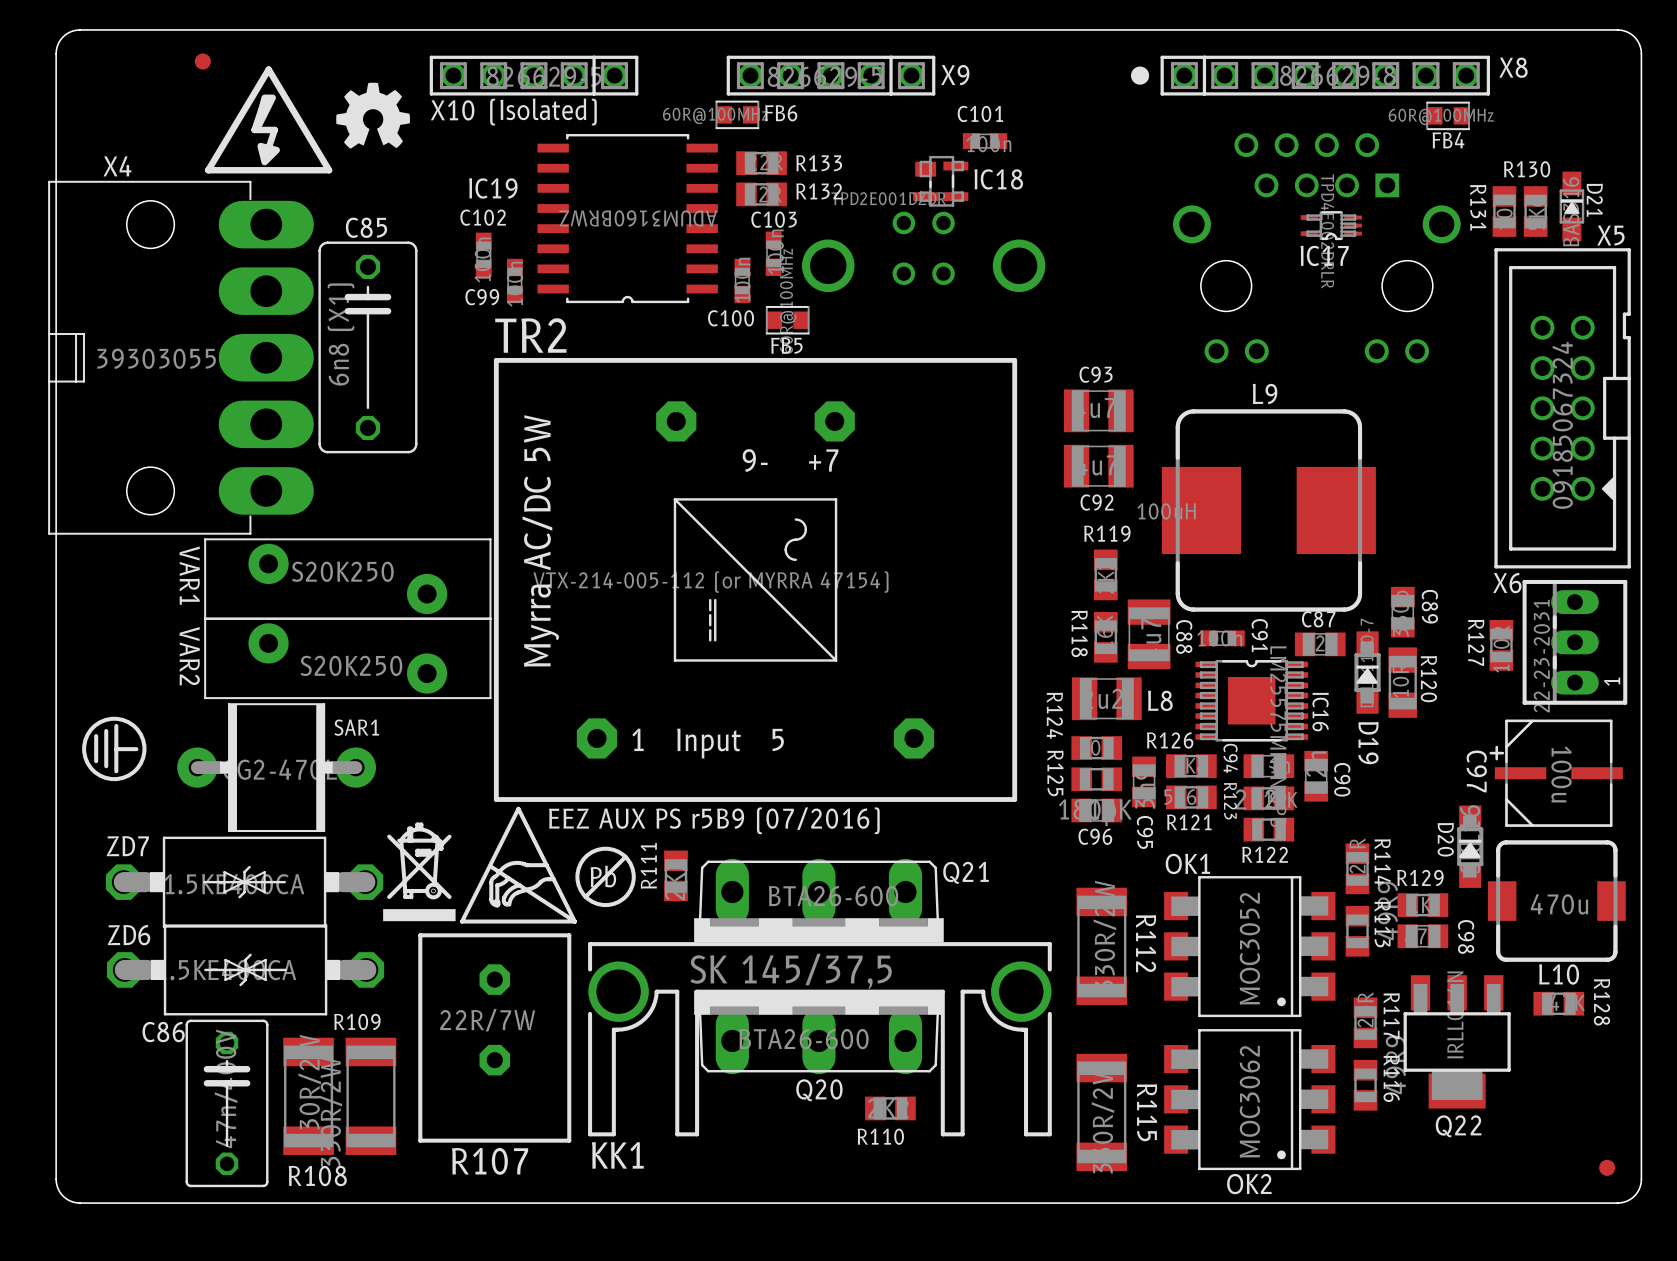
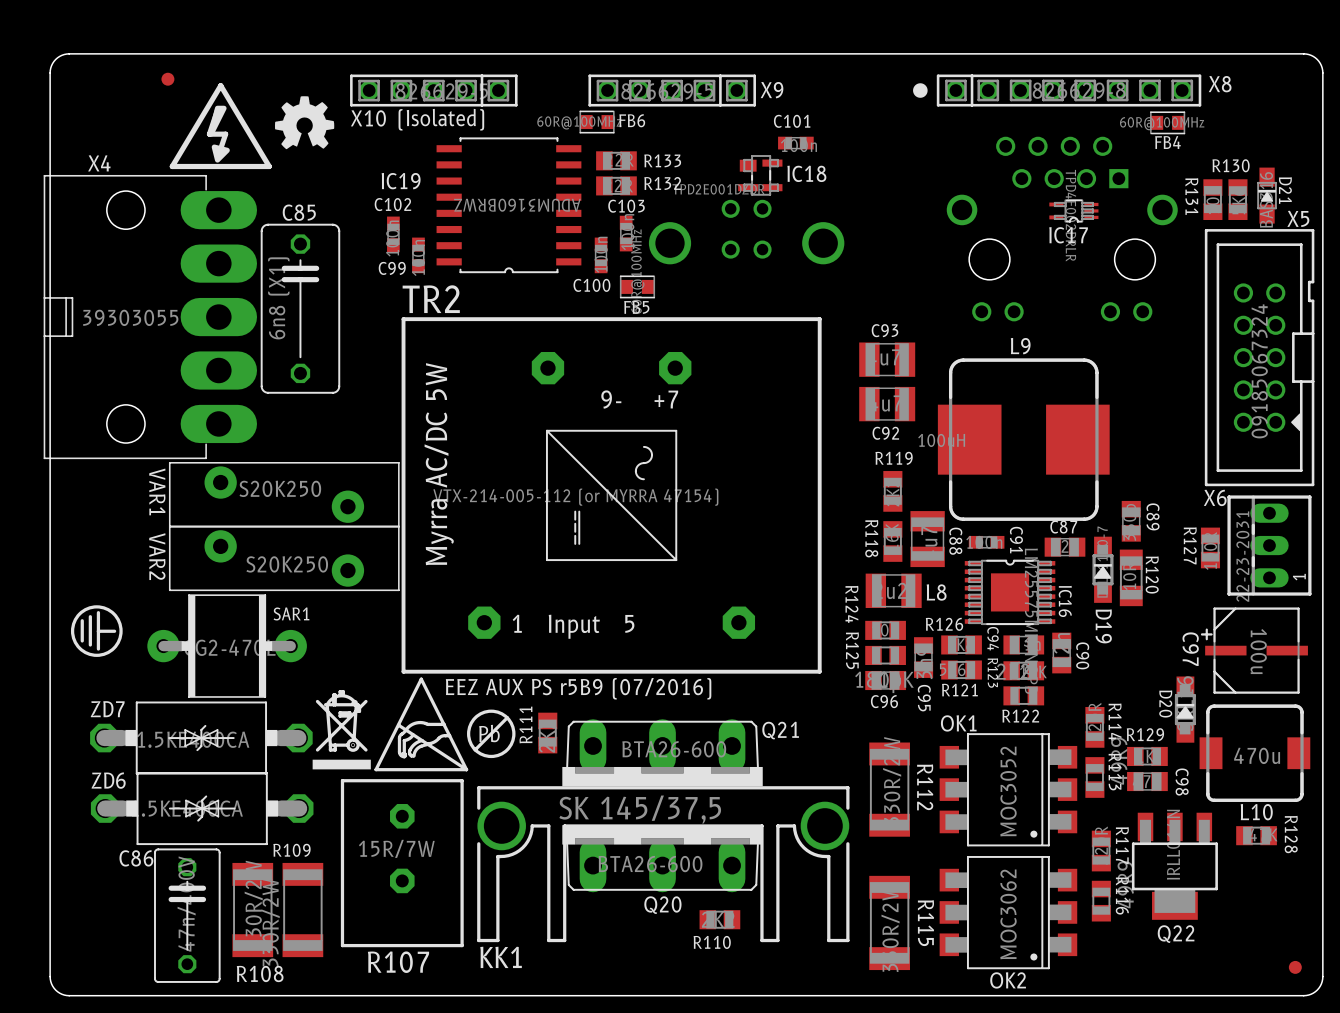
R107 value: 22R/7W (487, 1020) -> 15R/7W (396, 848)

